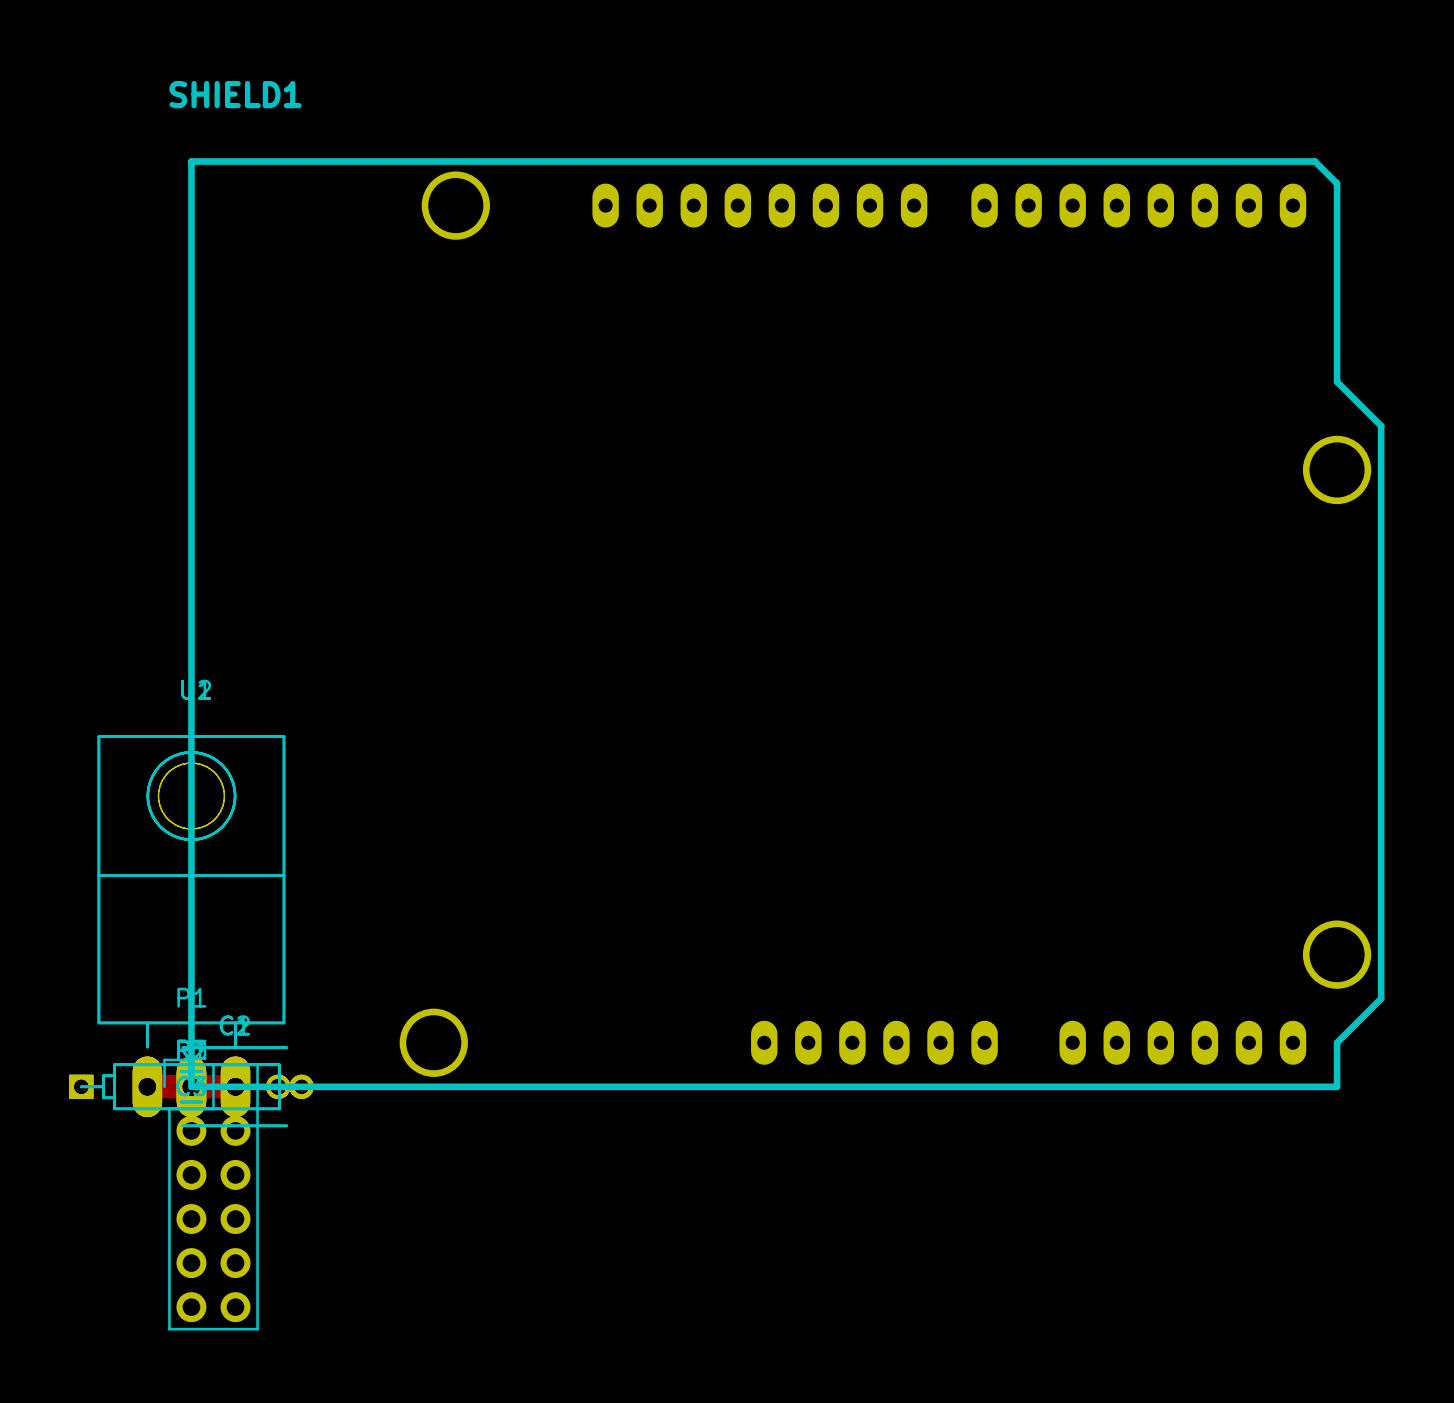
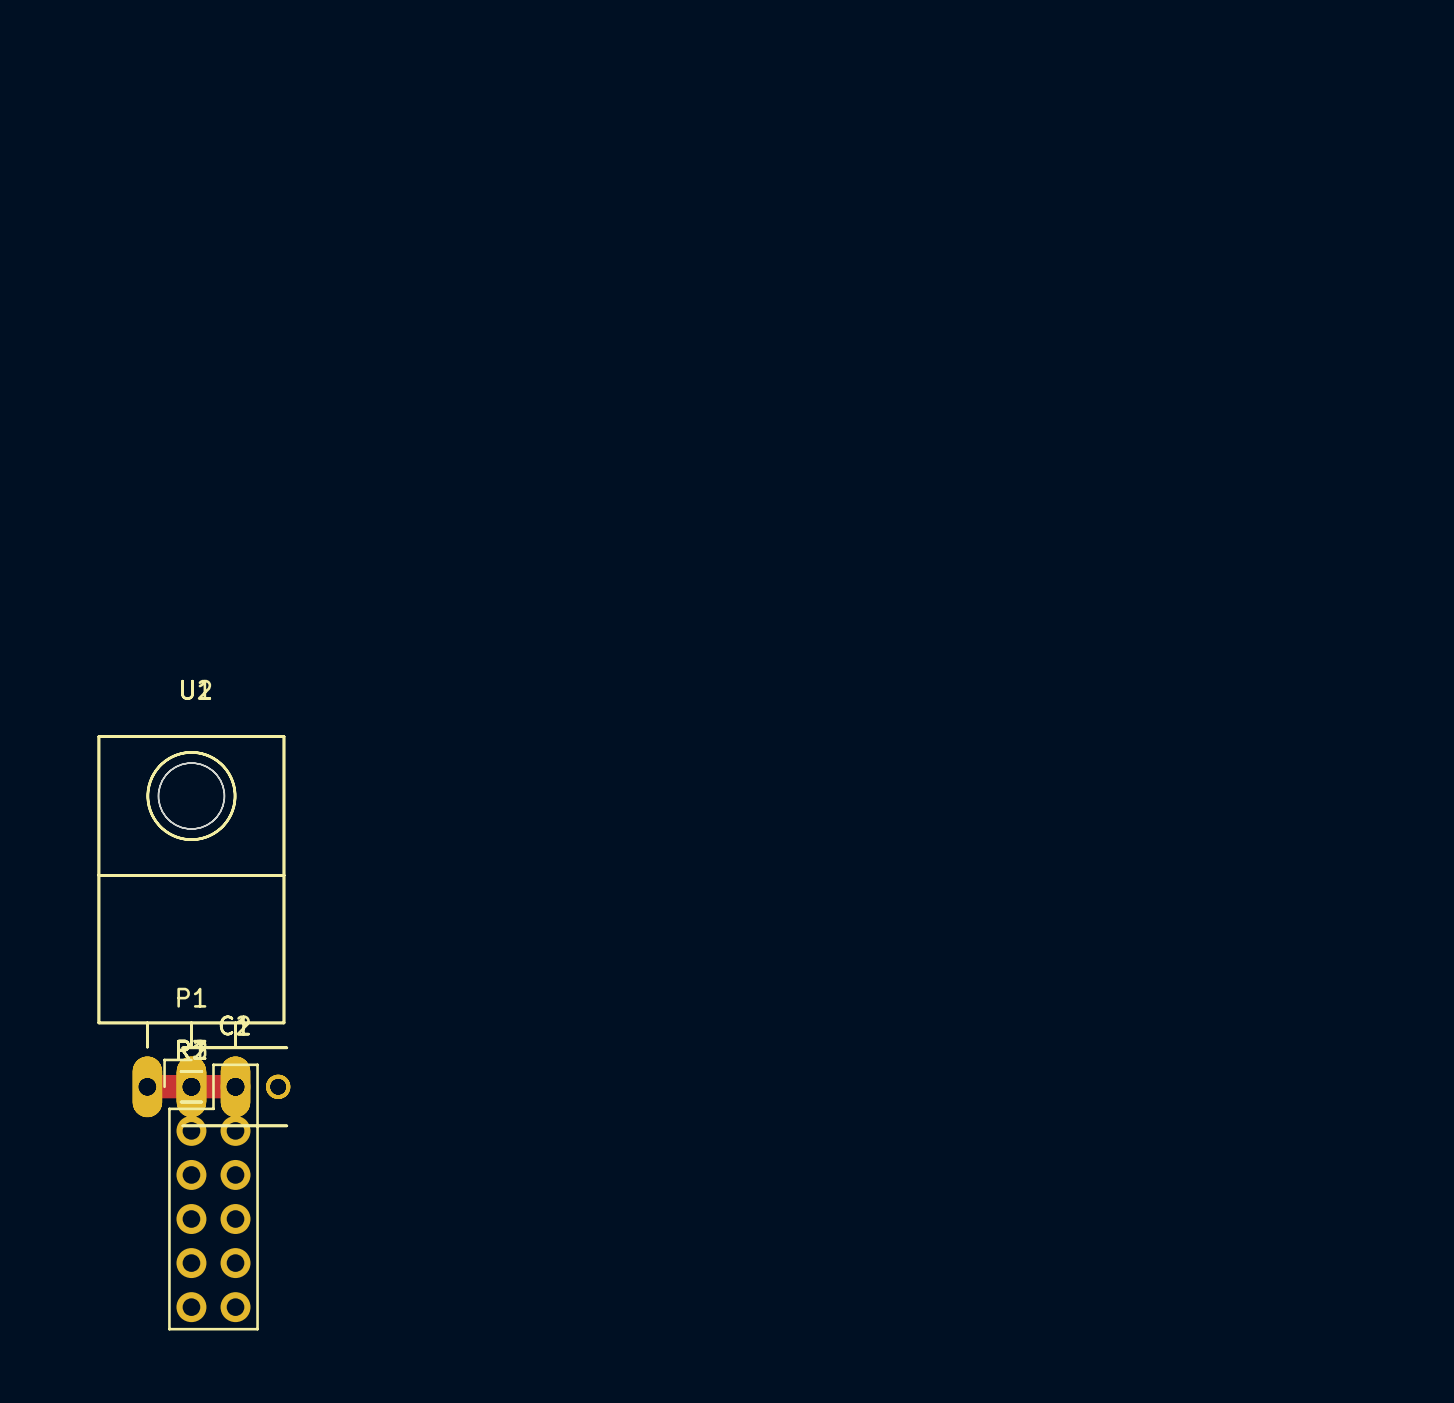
SHIELD1: (786, 624) -> none
part: (191, 1086) -> none
part: (191, 1086) -> none

